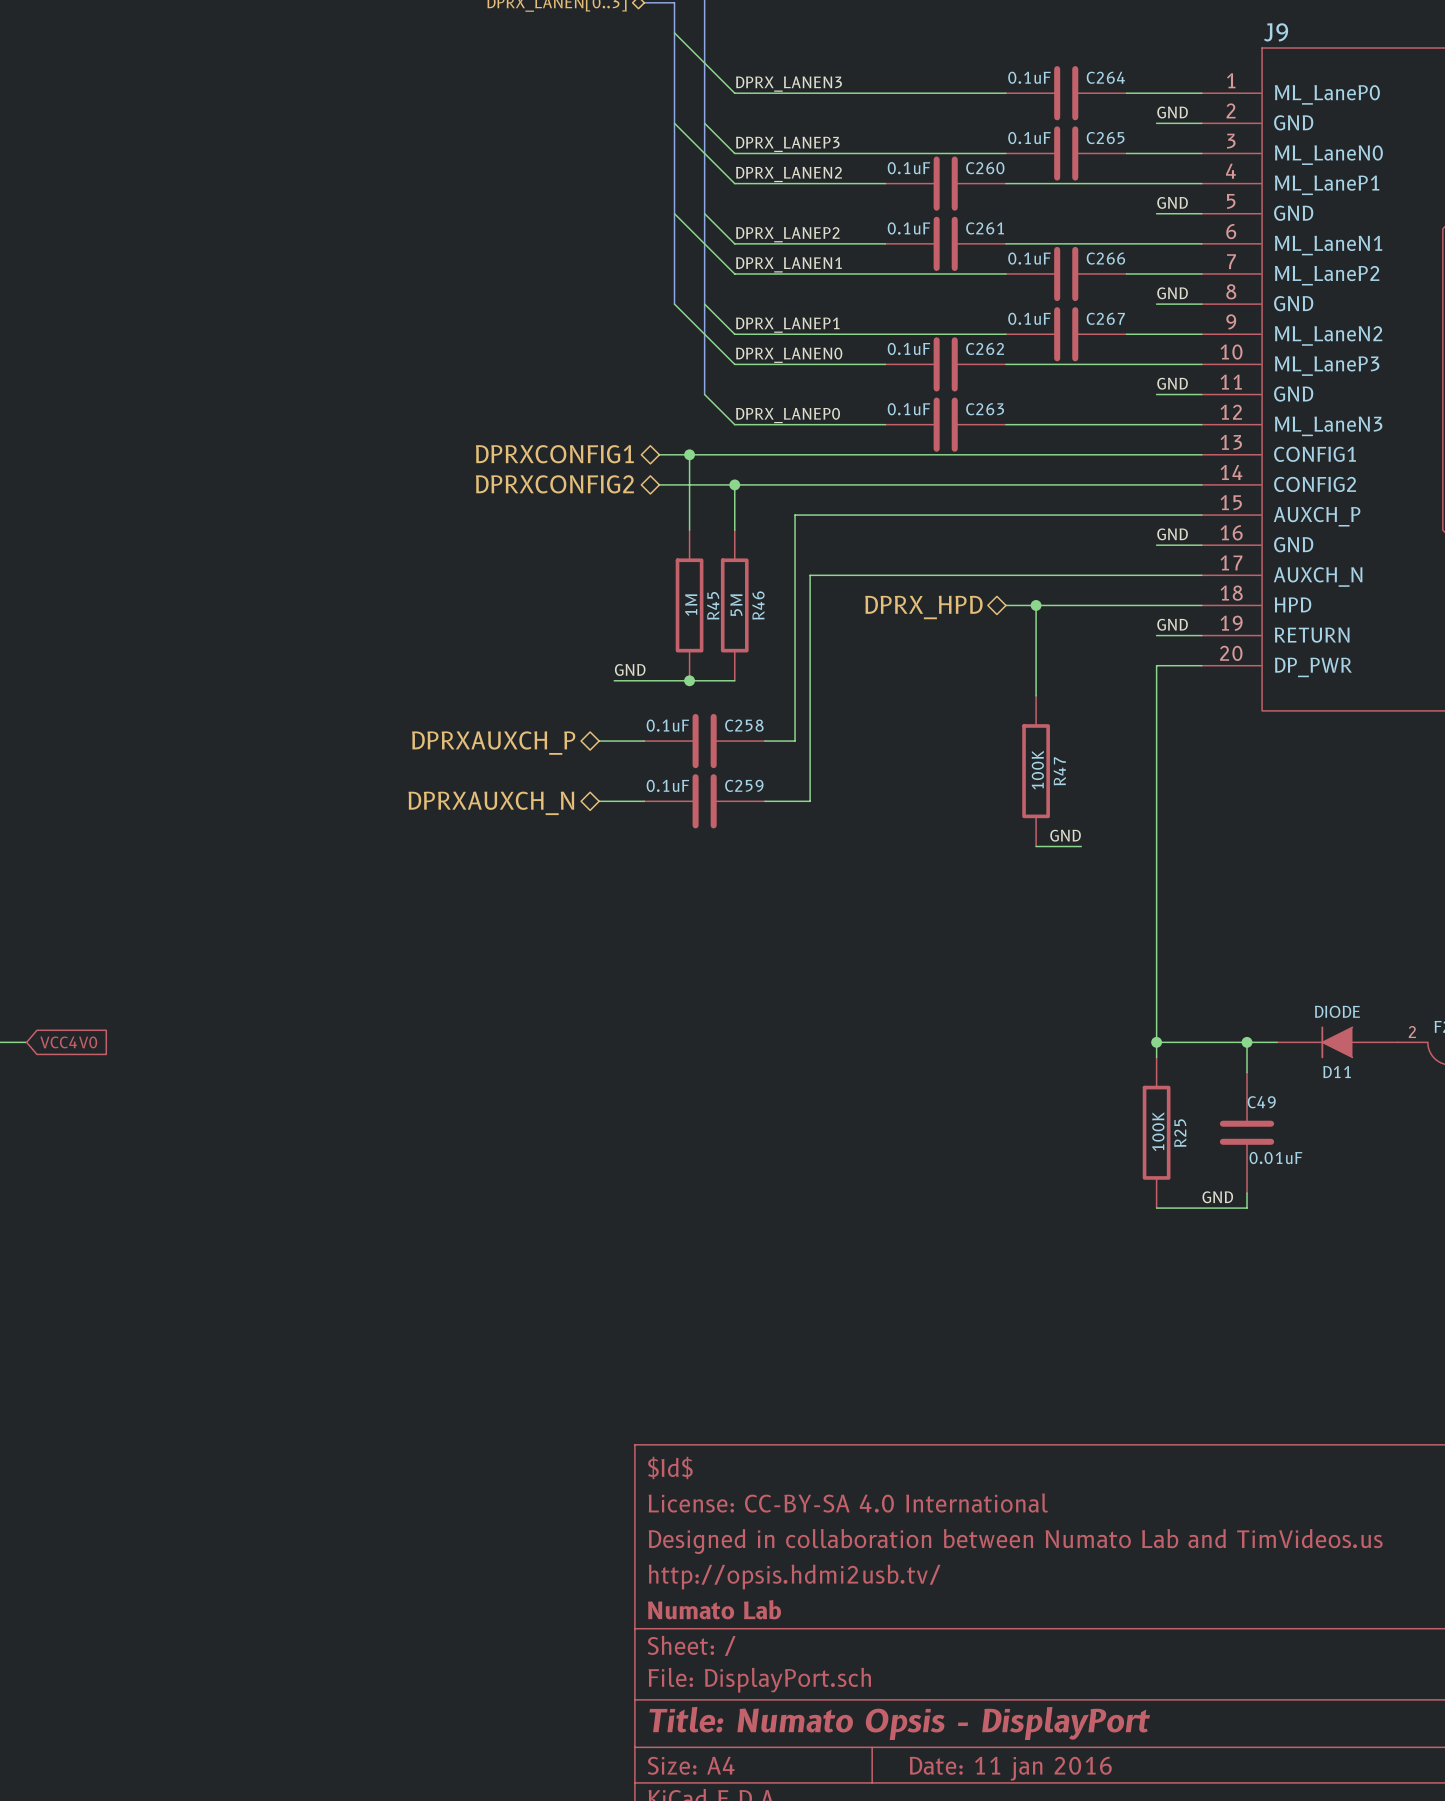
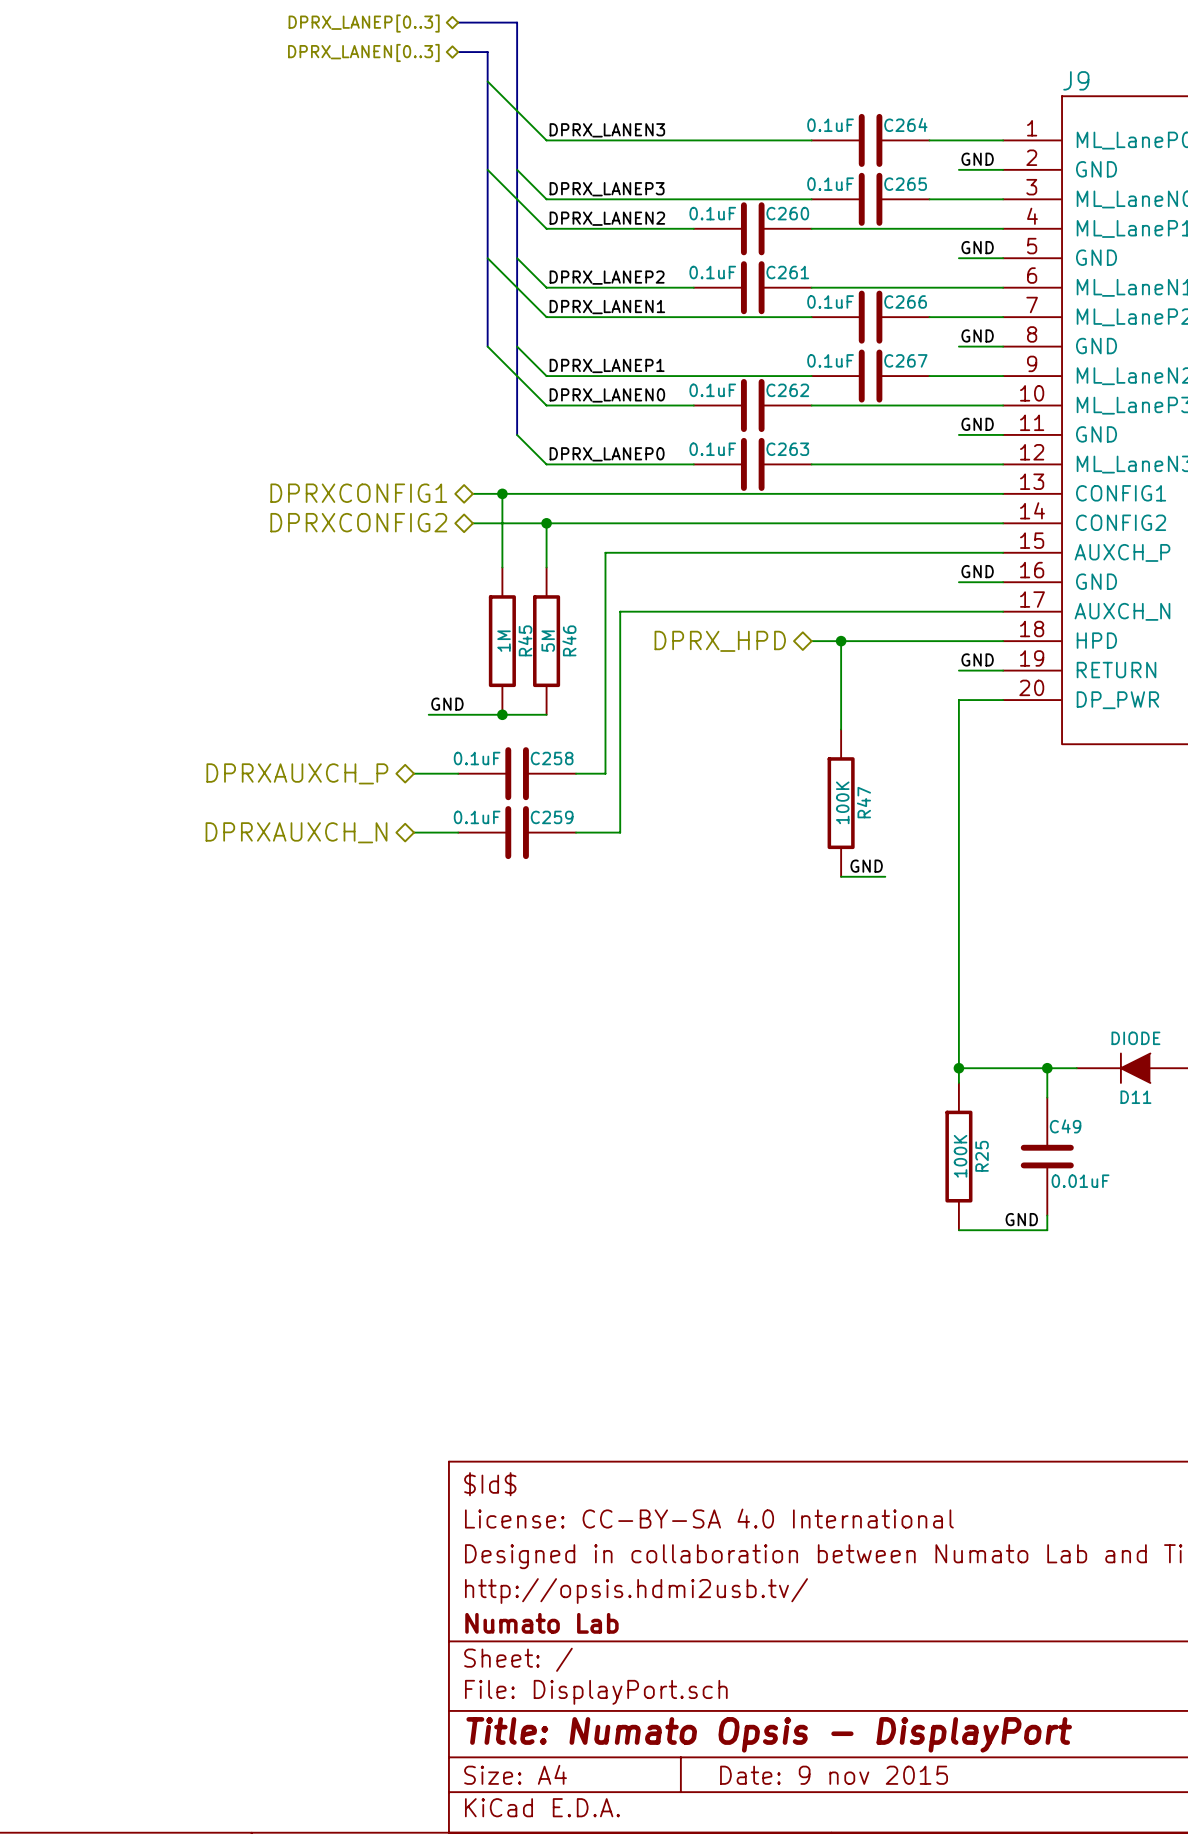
title block: Date: 11 jan 2016 (1010, 1768) -> Date: 9 nov 2015 (834, 1775)

